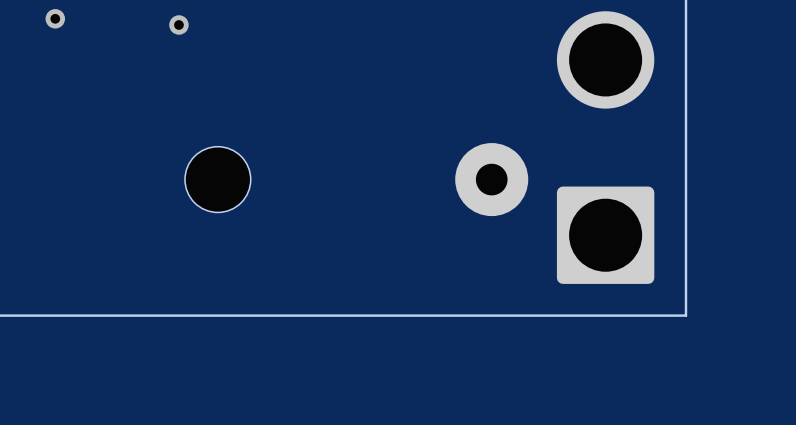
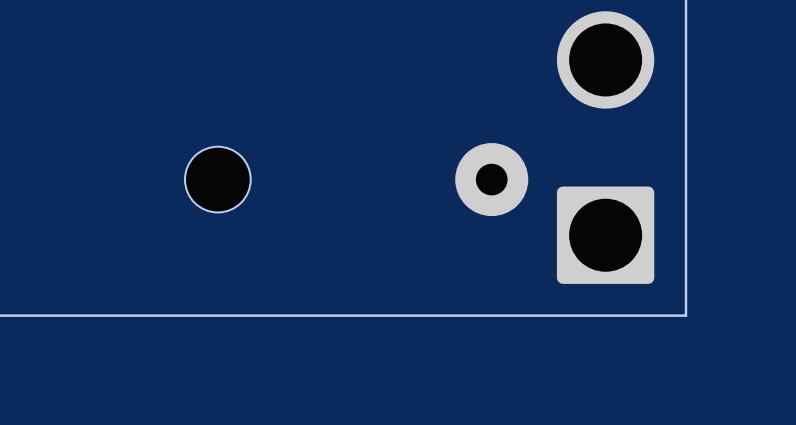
via: (55, 18) -> none
via: (178, 24) -> none

